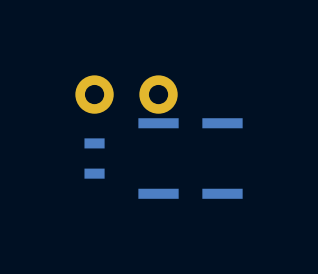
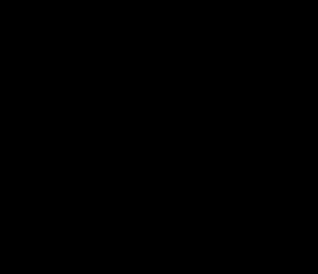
part: (126, 94) -> none
part: (94, 158) -> none
part: (158, 158) -> none
part: (222, 158) -> none

